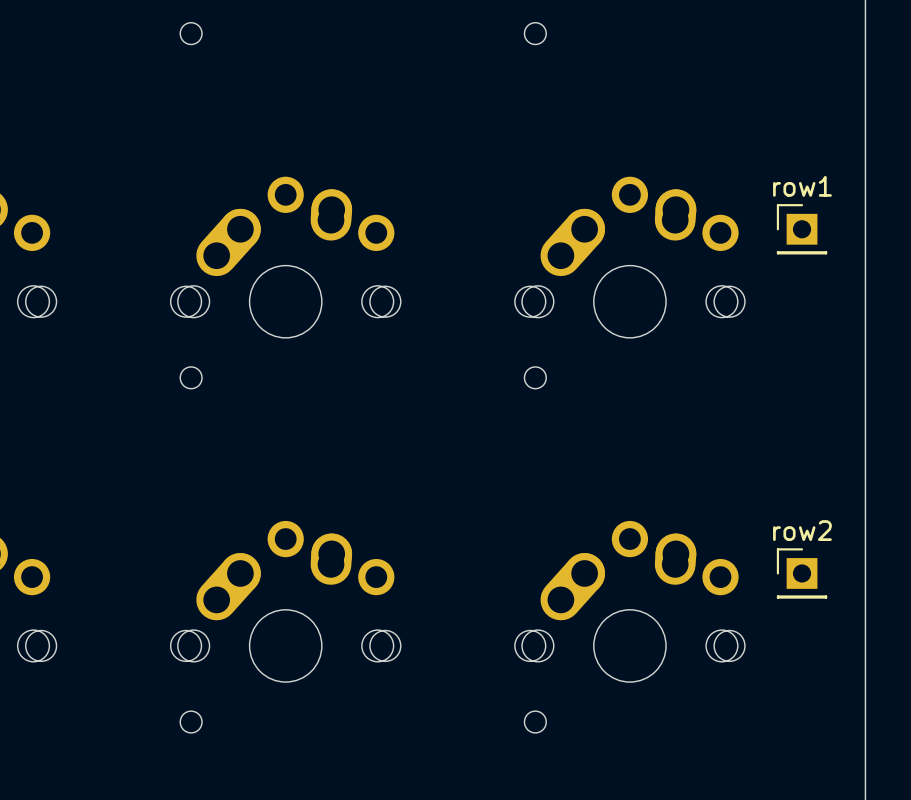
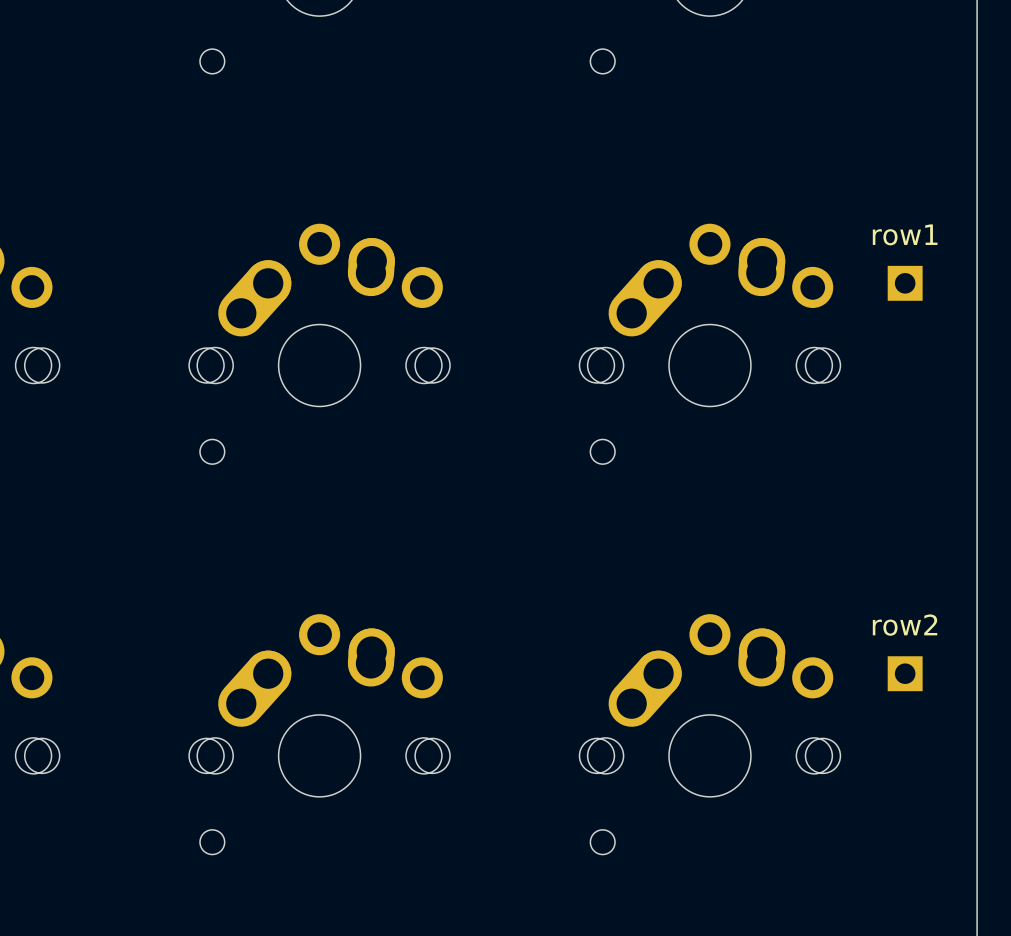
row1 footprint: [776, 204, 828, 255] -> [887, 265, 923, 301]
row2 footprint: [776, 548, 828, 599] -> [887, 656, 923, 692]

